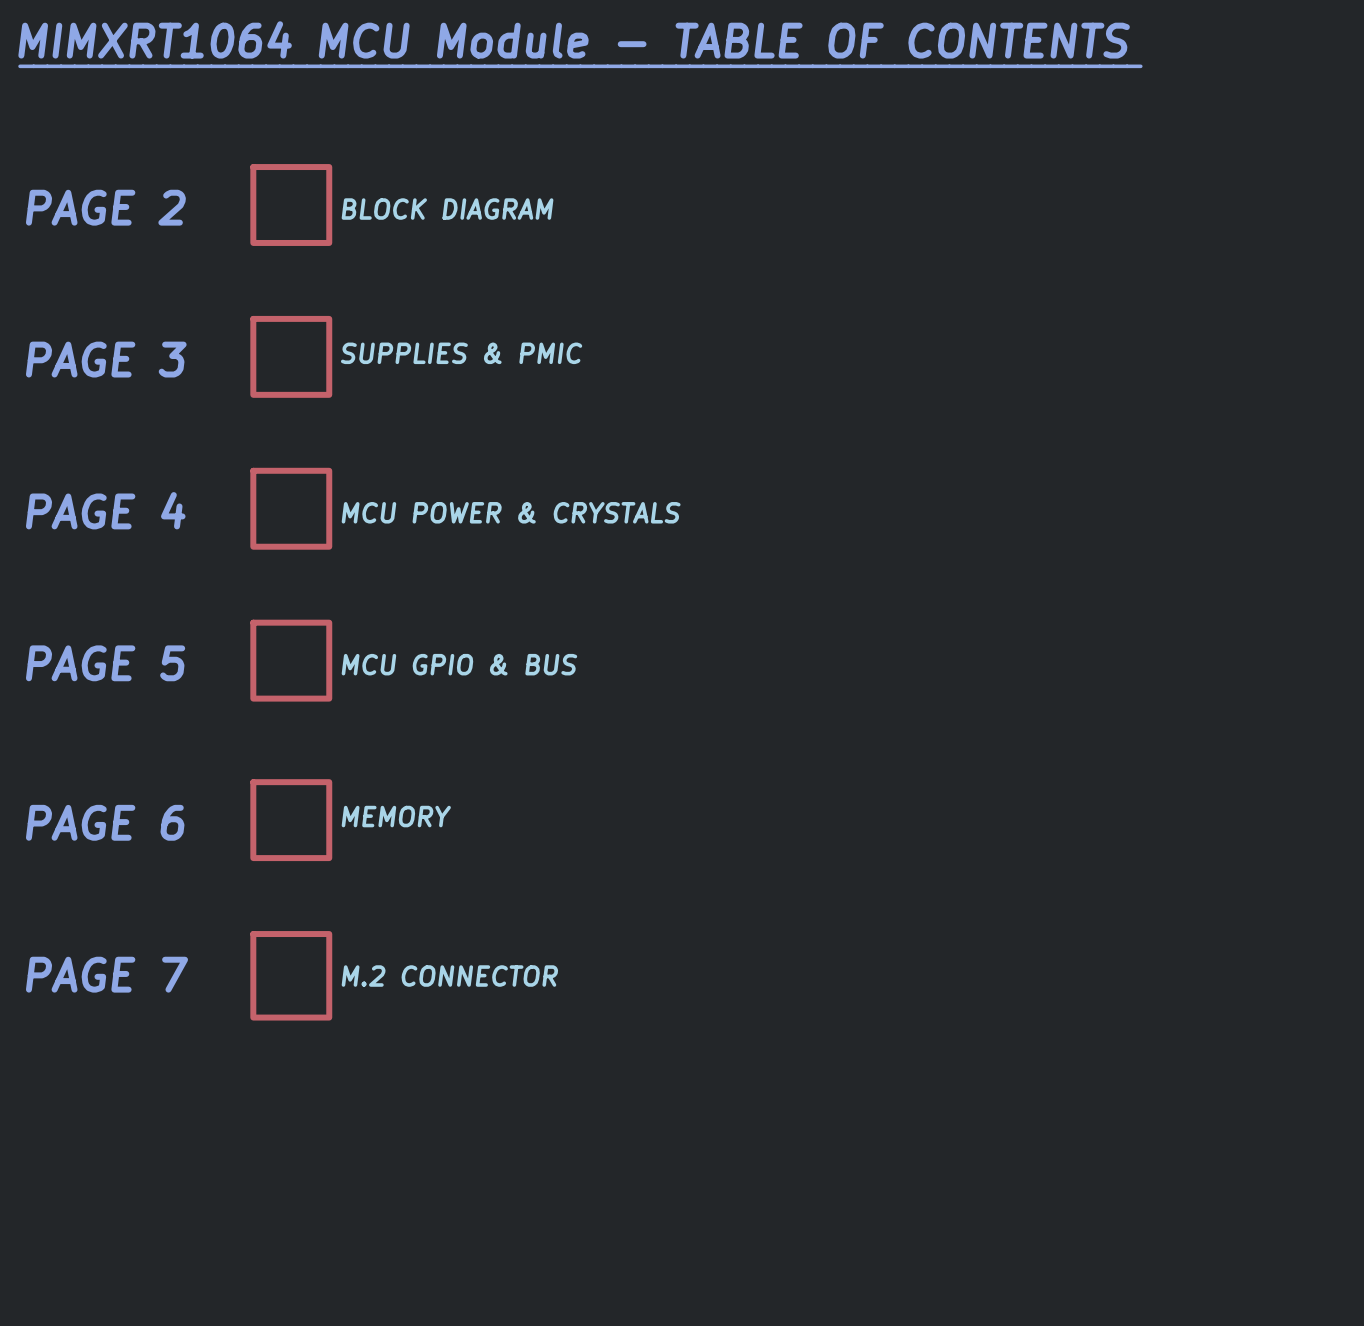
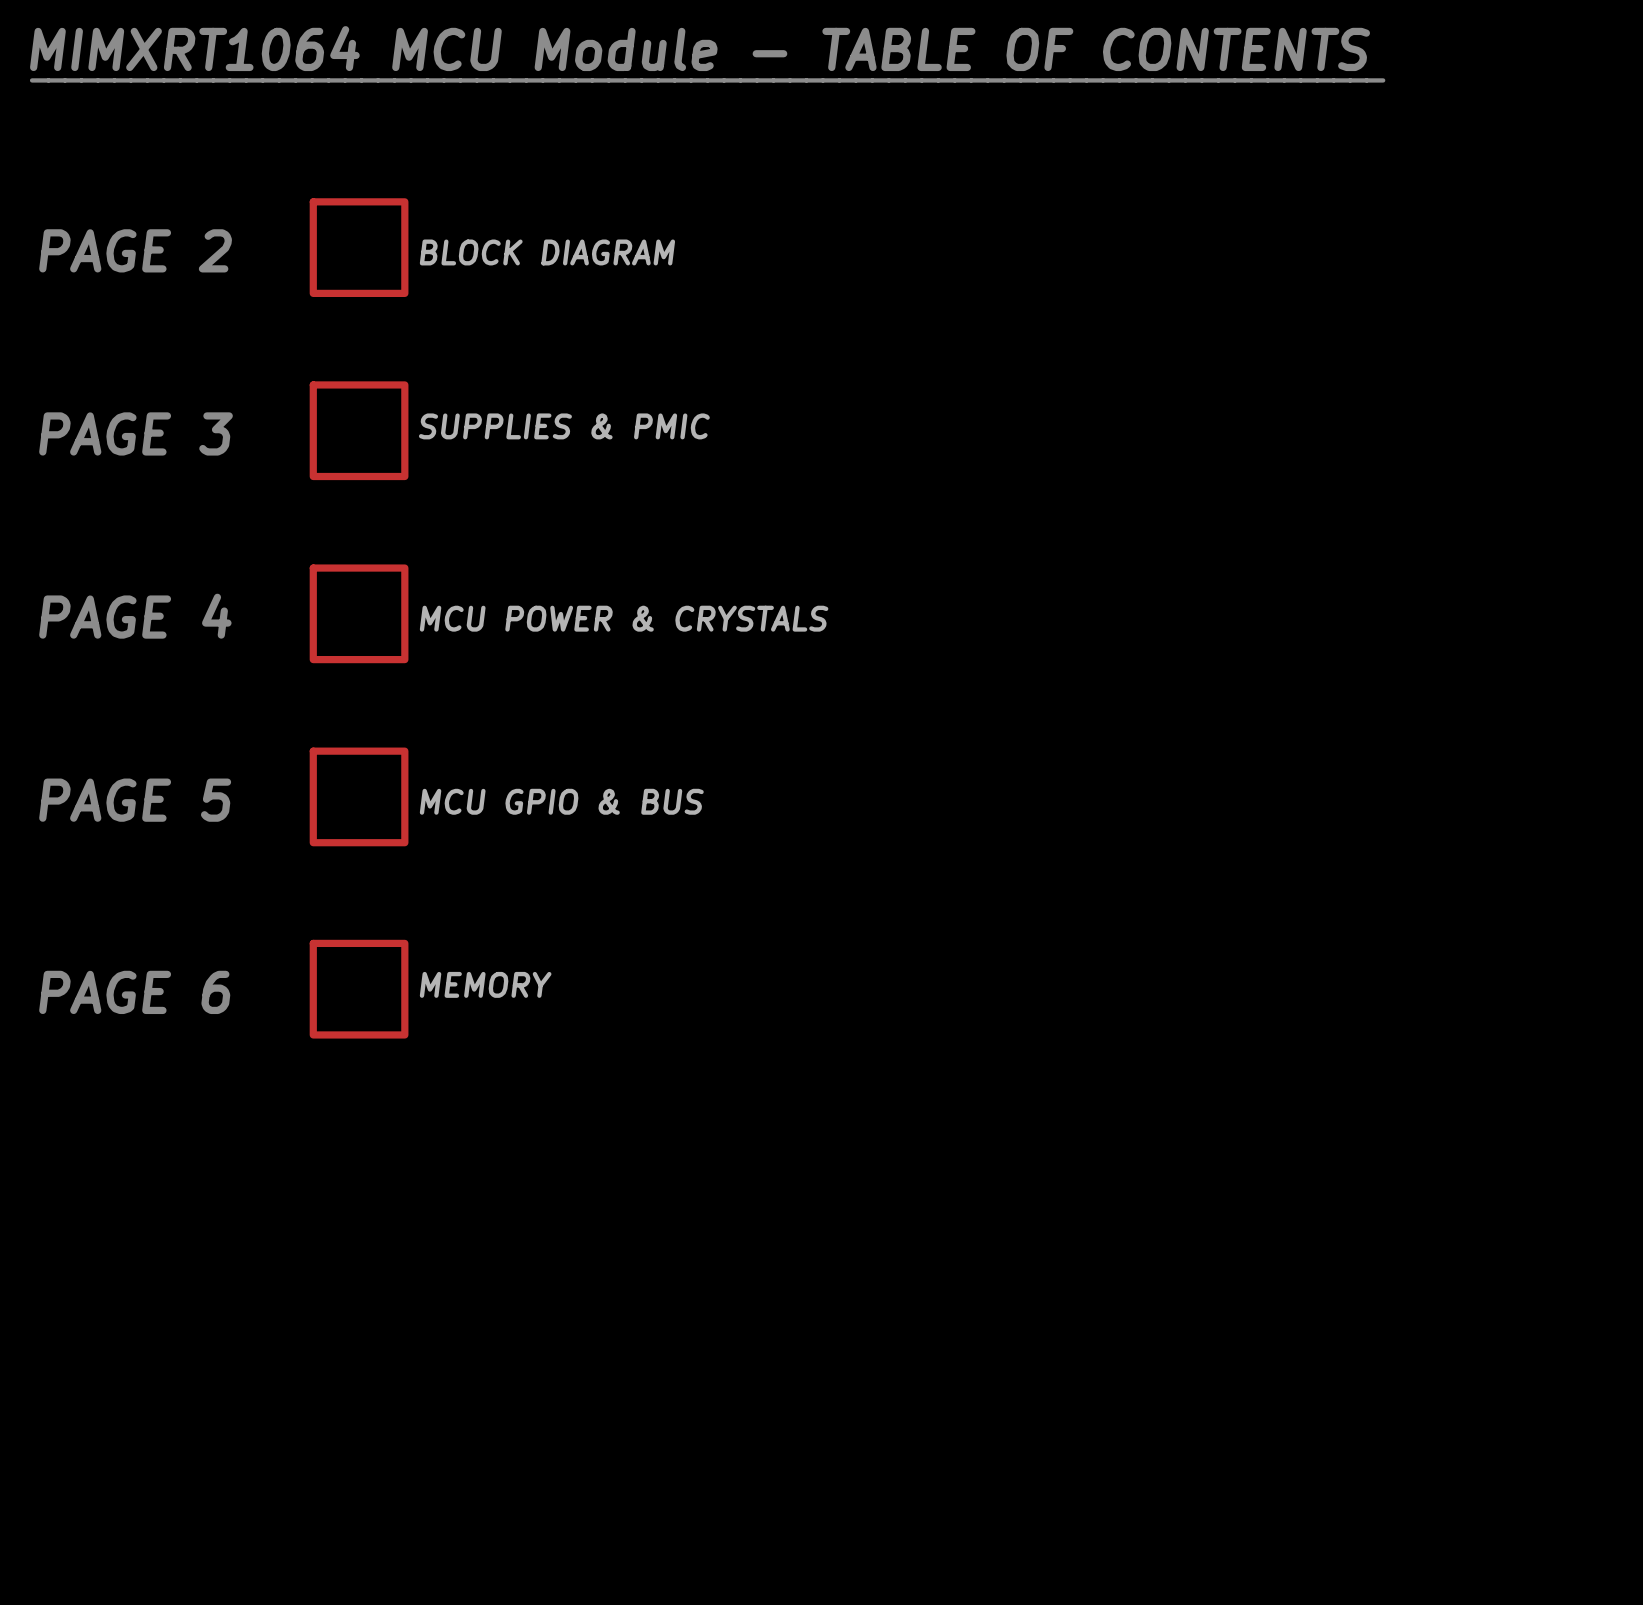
text: PAGE 7 (106, 974) -> none
sheet M.2 CONNECTOR: (291, 975) -> none

